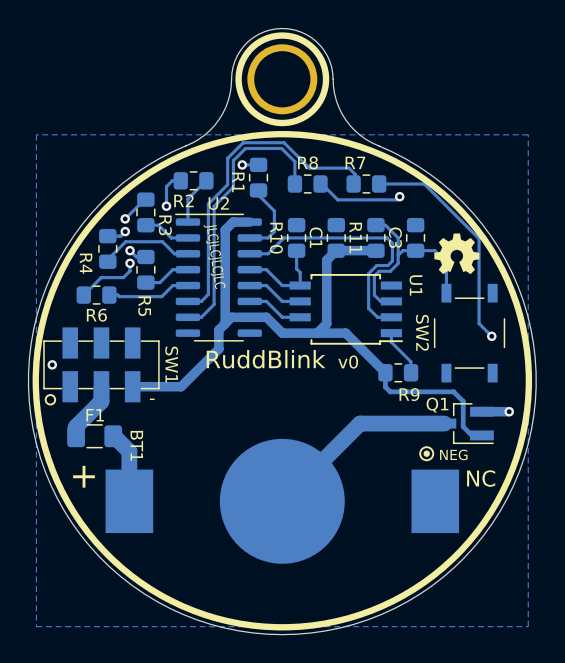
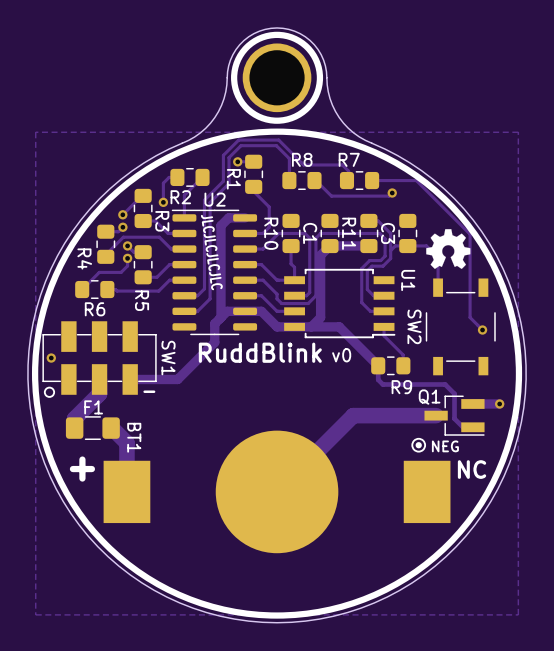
track: none -> (305, 233) (309, 238) (309, 292) (306, 295) (297, 295)
track: (326, 237) (310, 237) -> (320, 233) (315, 238) (315, 295) (308, 303) (281, 303) (277, 298) (277, 294) (261, 280)
track: (266, 285) (282, 301) (300, 301) -> none

